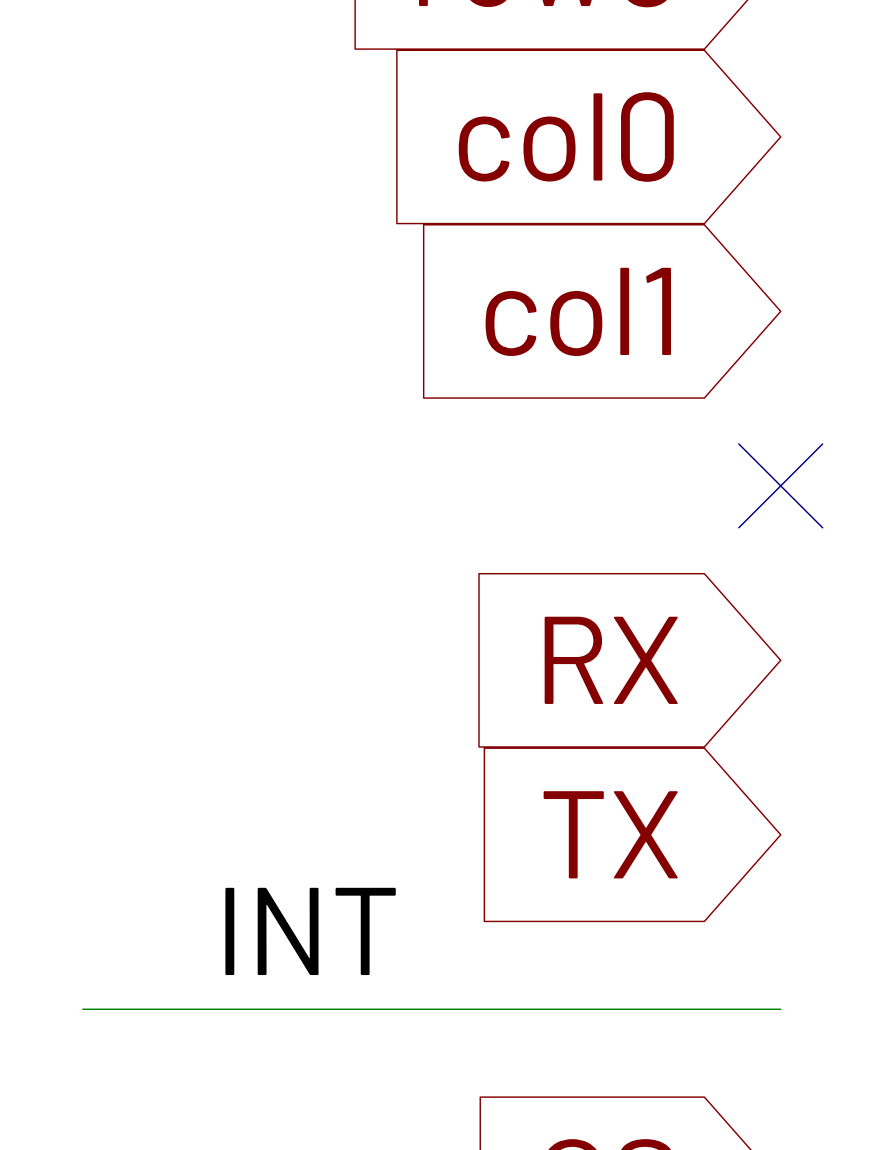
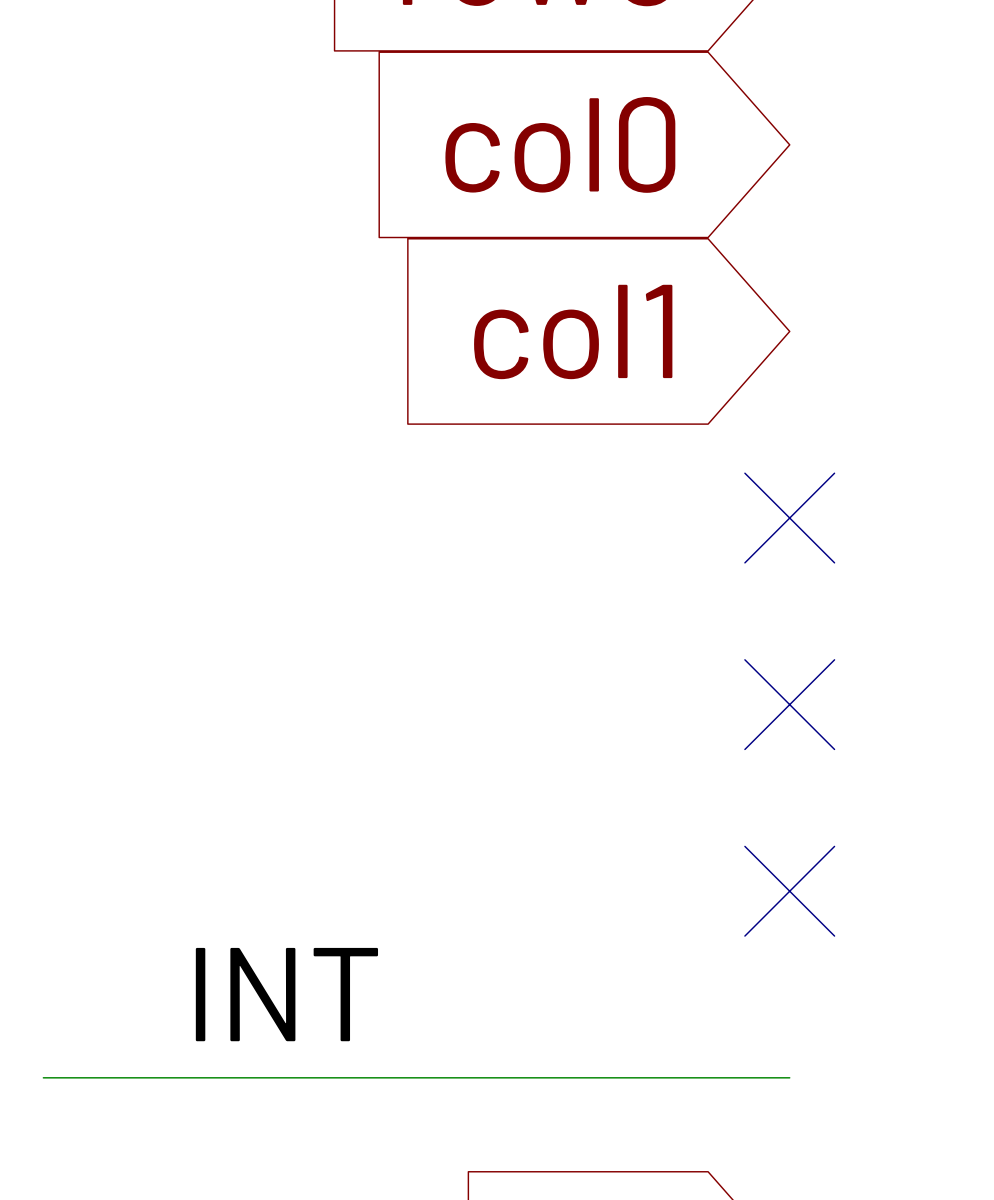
global label: RX (611, 660) -> none
no-connect mark: none -> (789, 704)
global label: TX (610, 834) -> none
no-connect mark: none -> (789, 891)

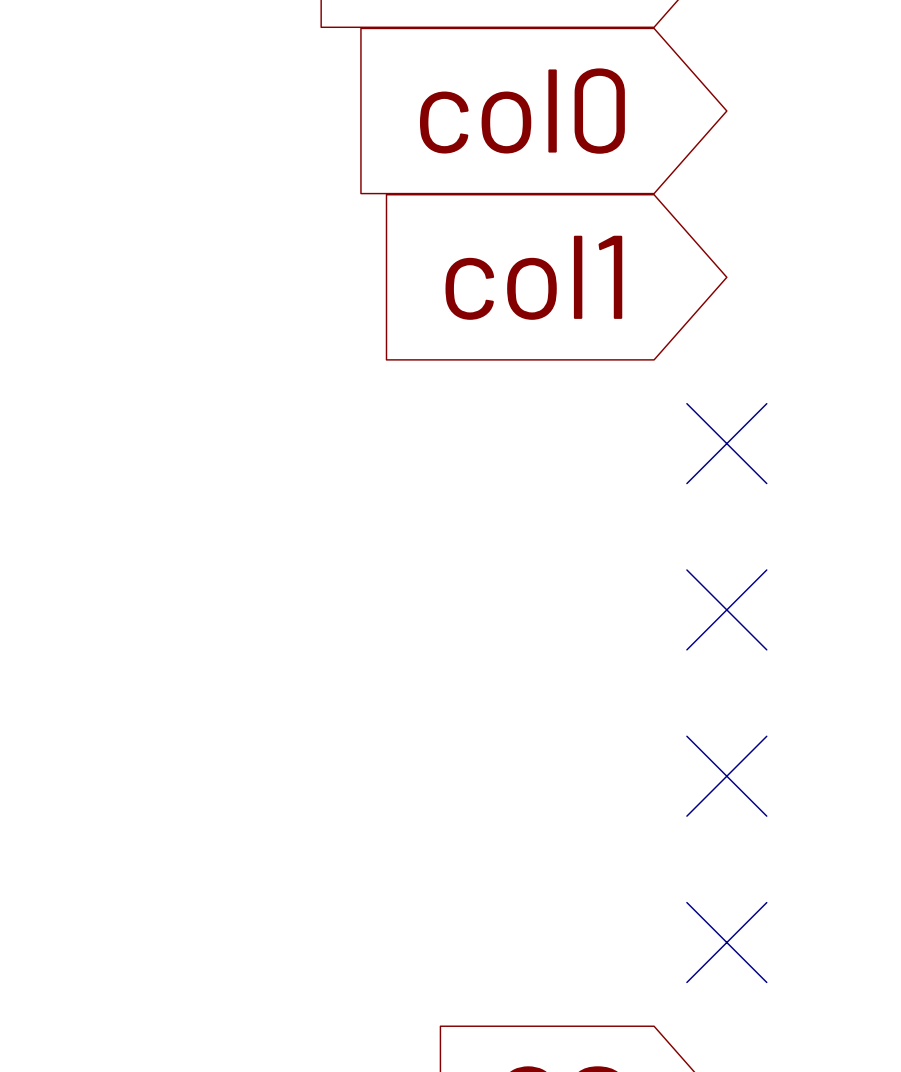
label: INT (286, 994) -> none
wire: (43, 1077) (789, 1077) -> none
no-connect mark: none -> (726, 942)

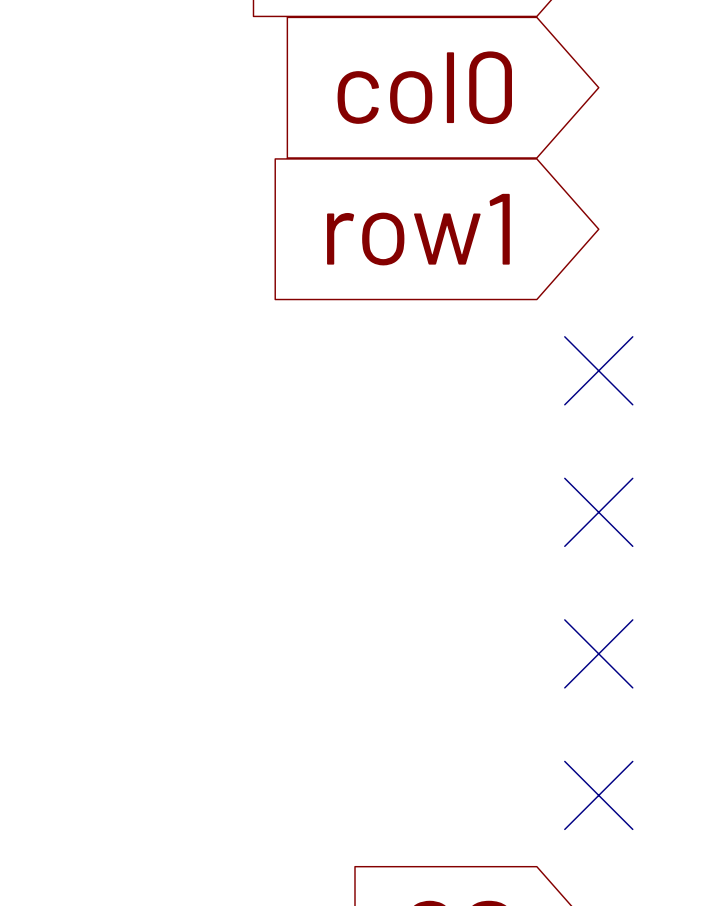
global label: col1 (533, 277) -> row1 (418, 229)

